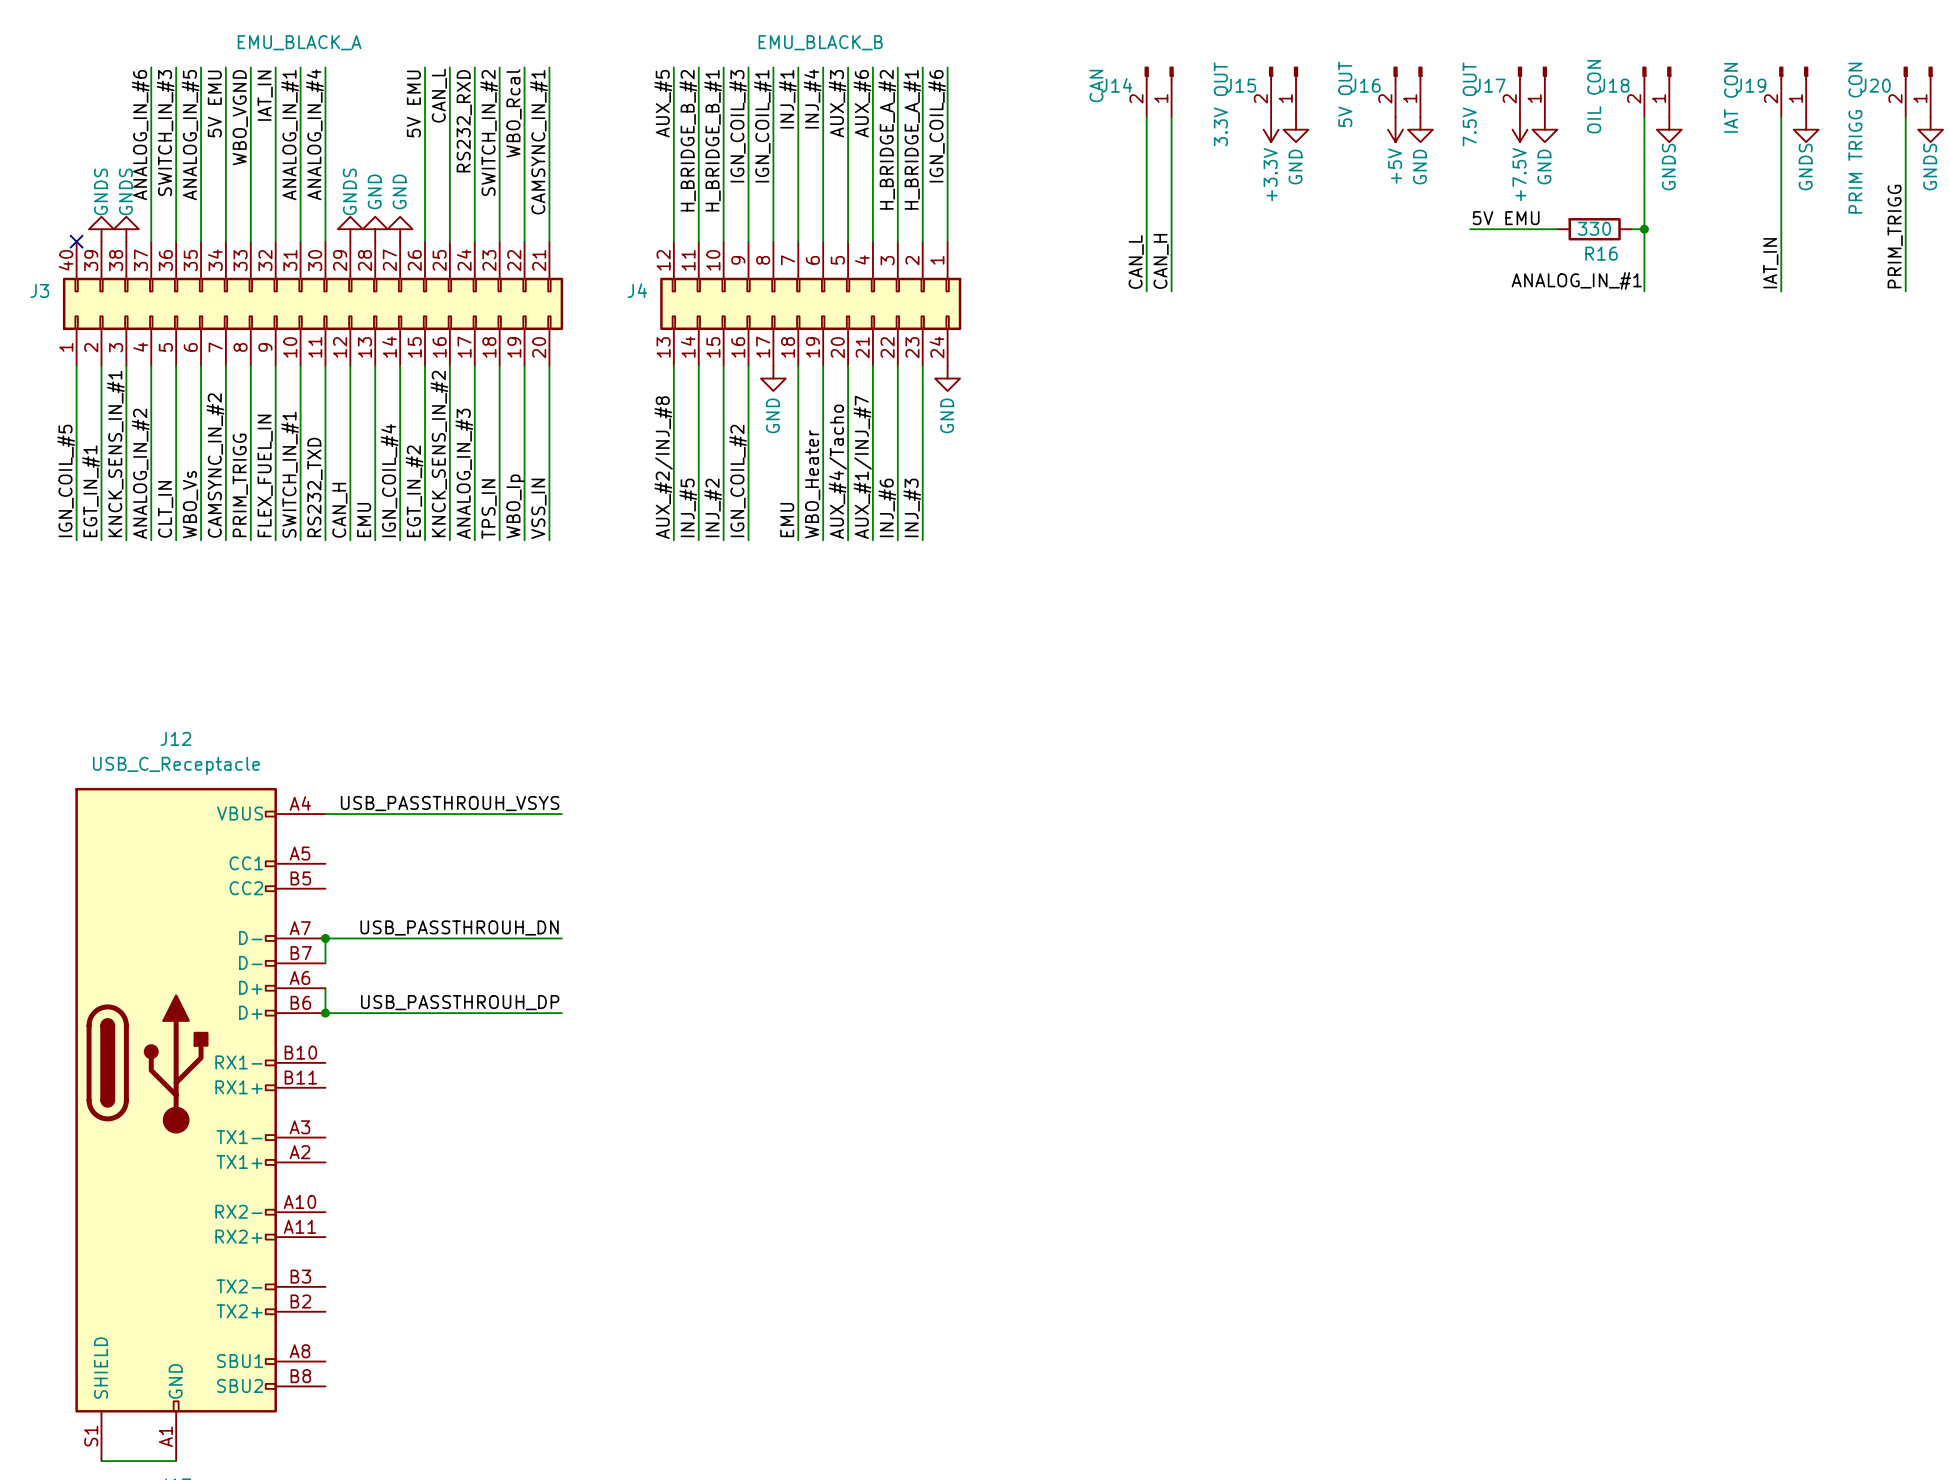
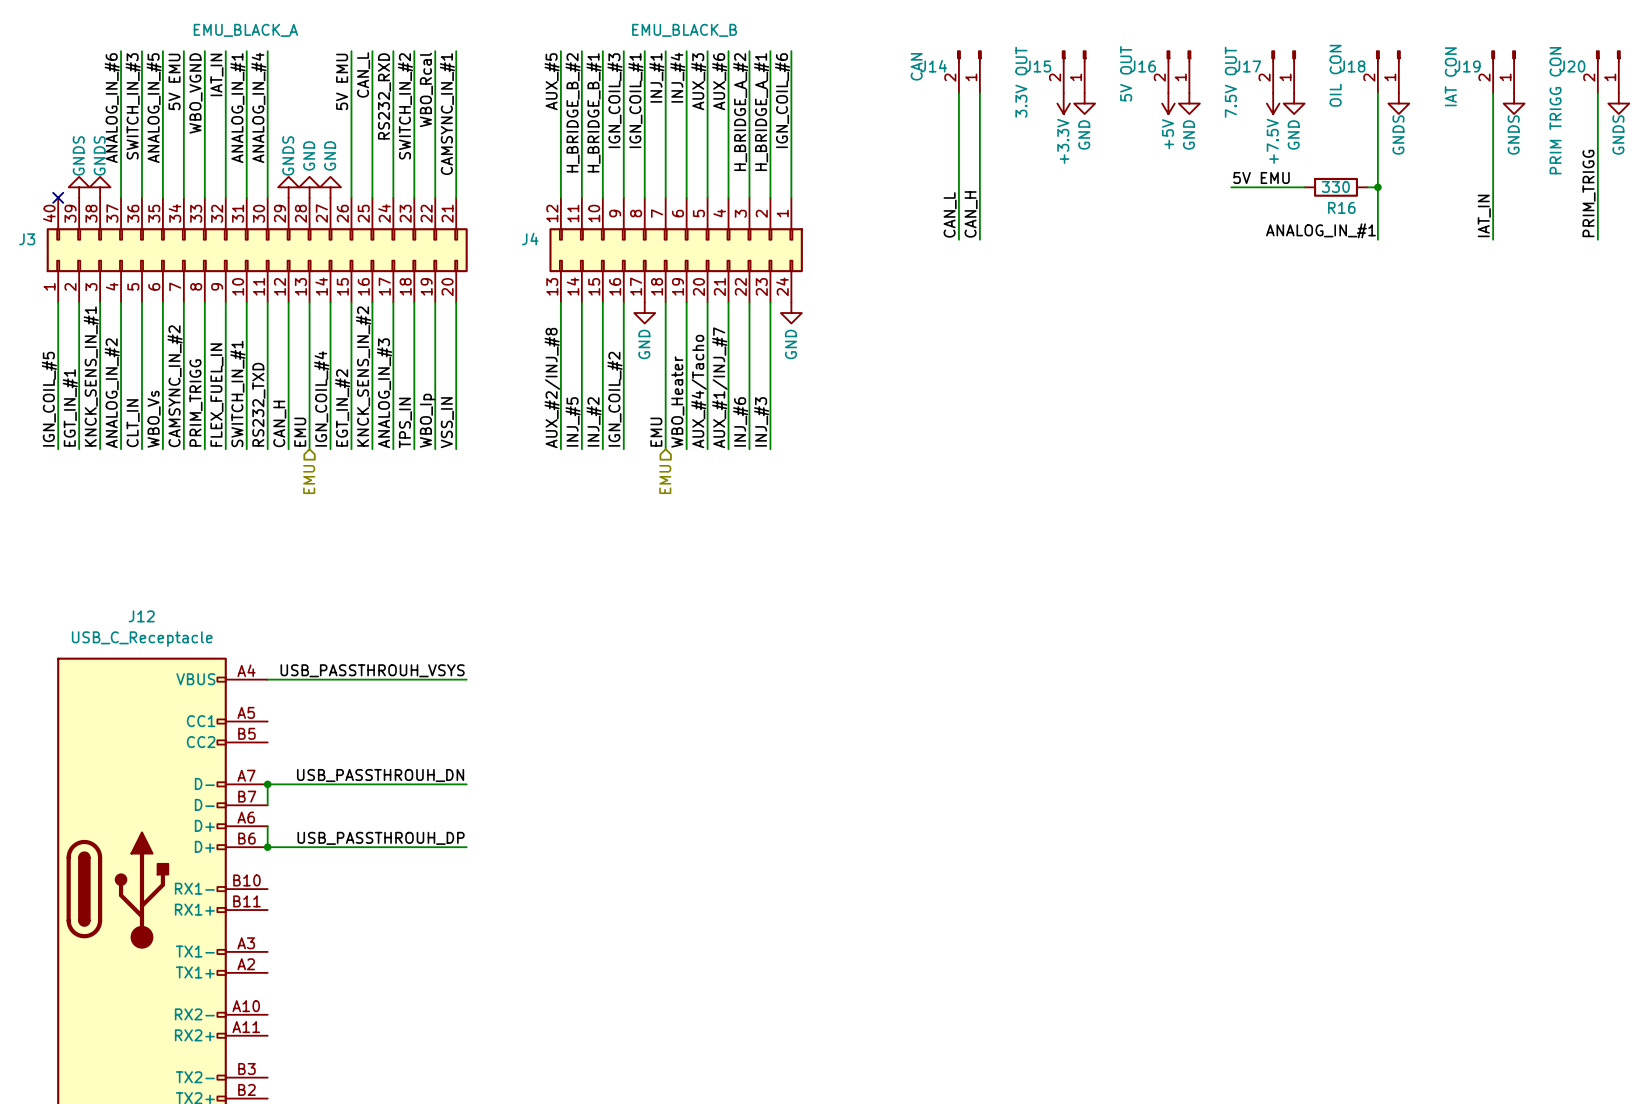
hierarchical label: none -> EMU (309, 479)
hierarchical label: none -> EMU (665, 479)

